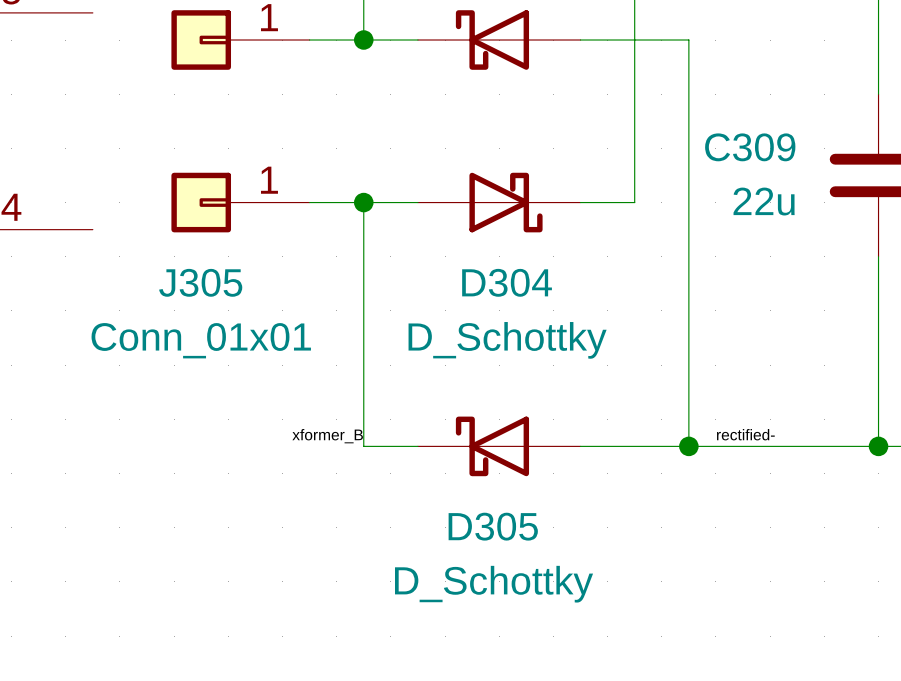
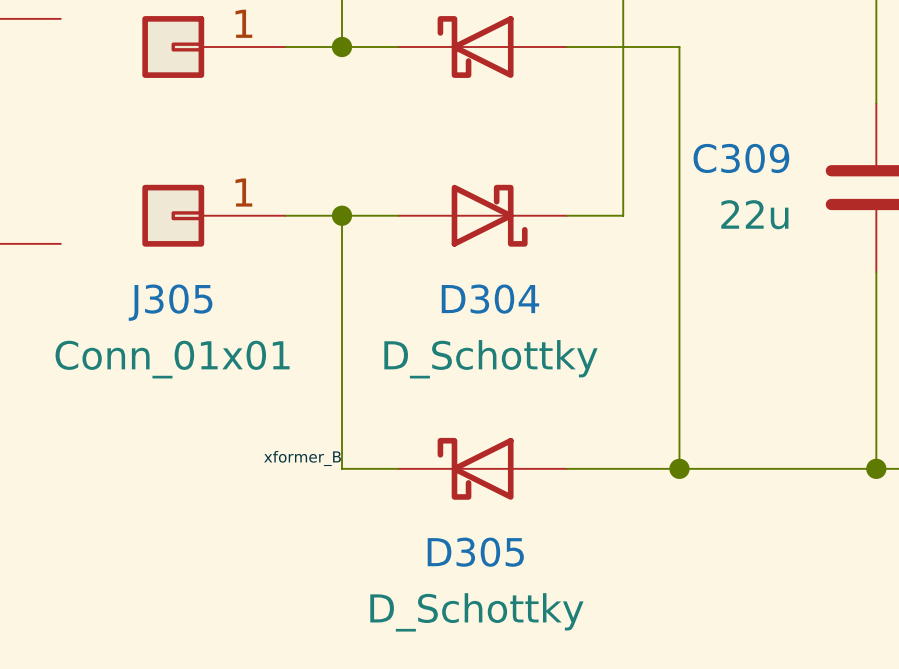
label: rectified- (745, 434) -> none

